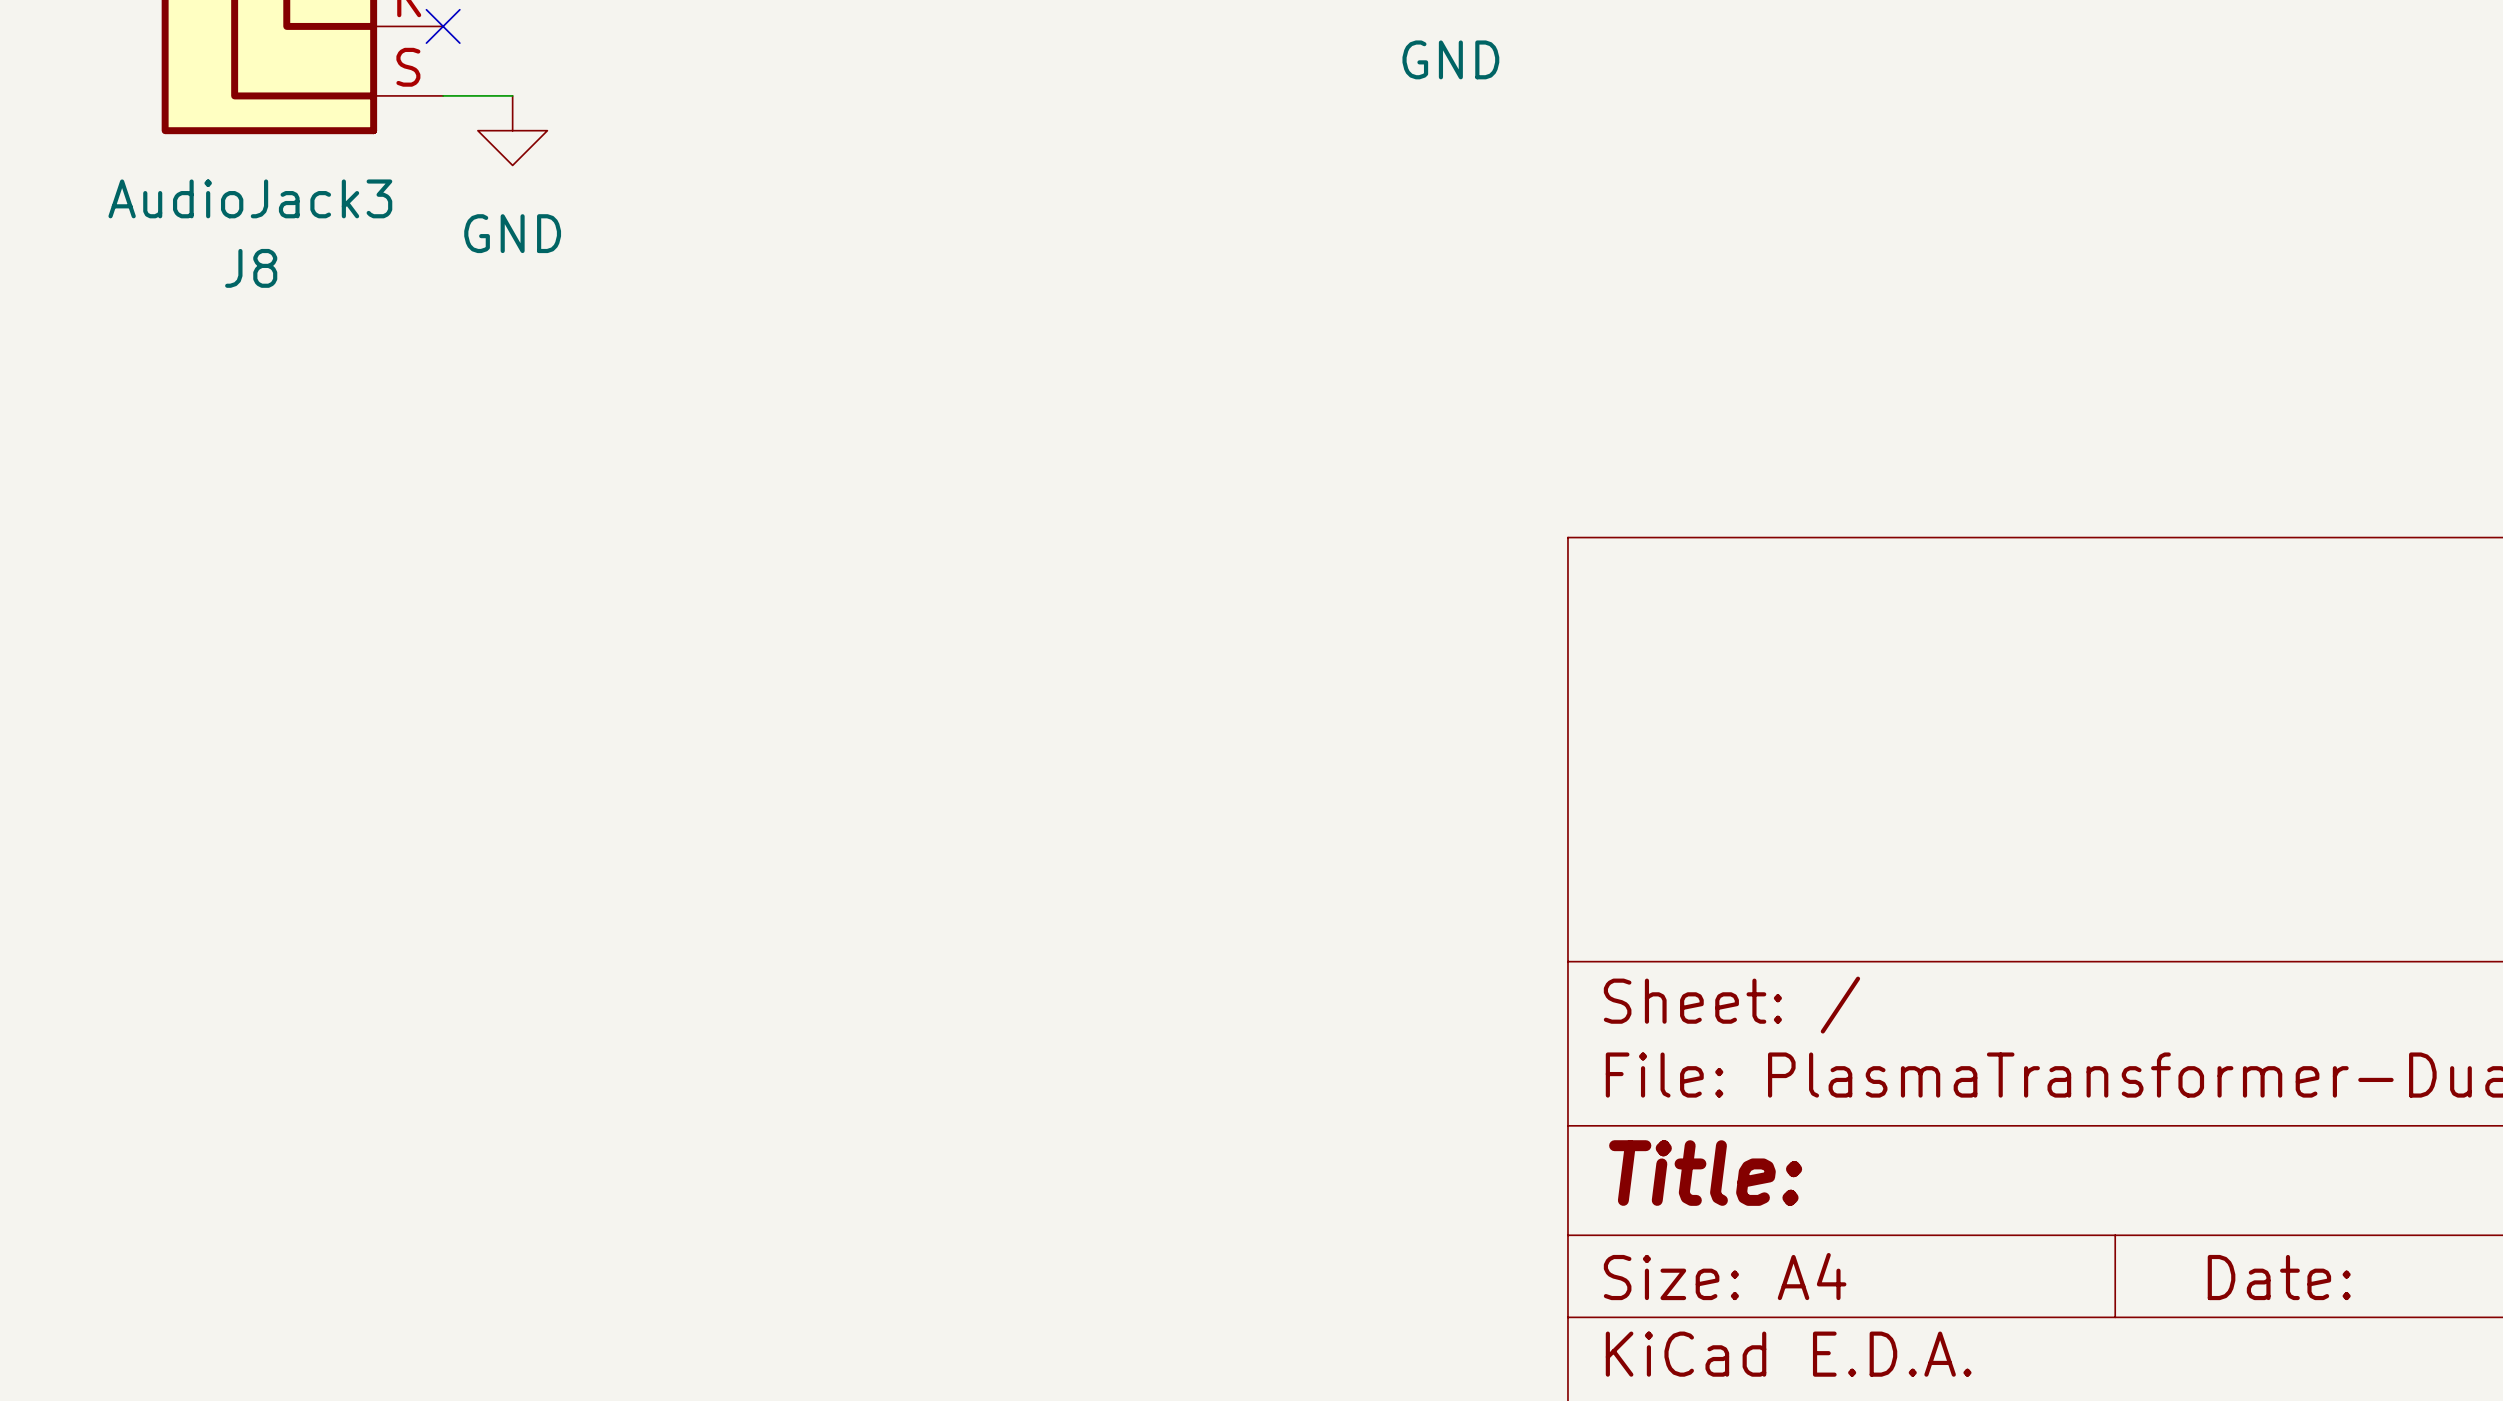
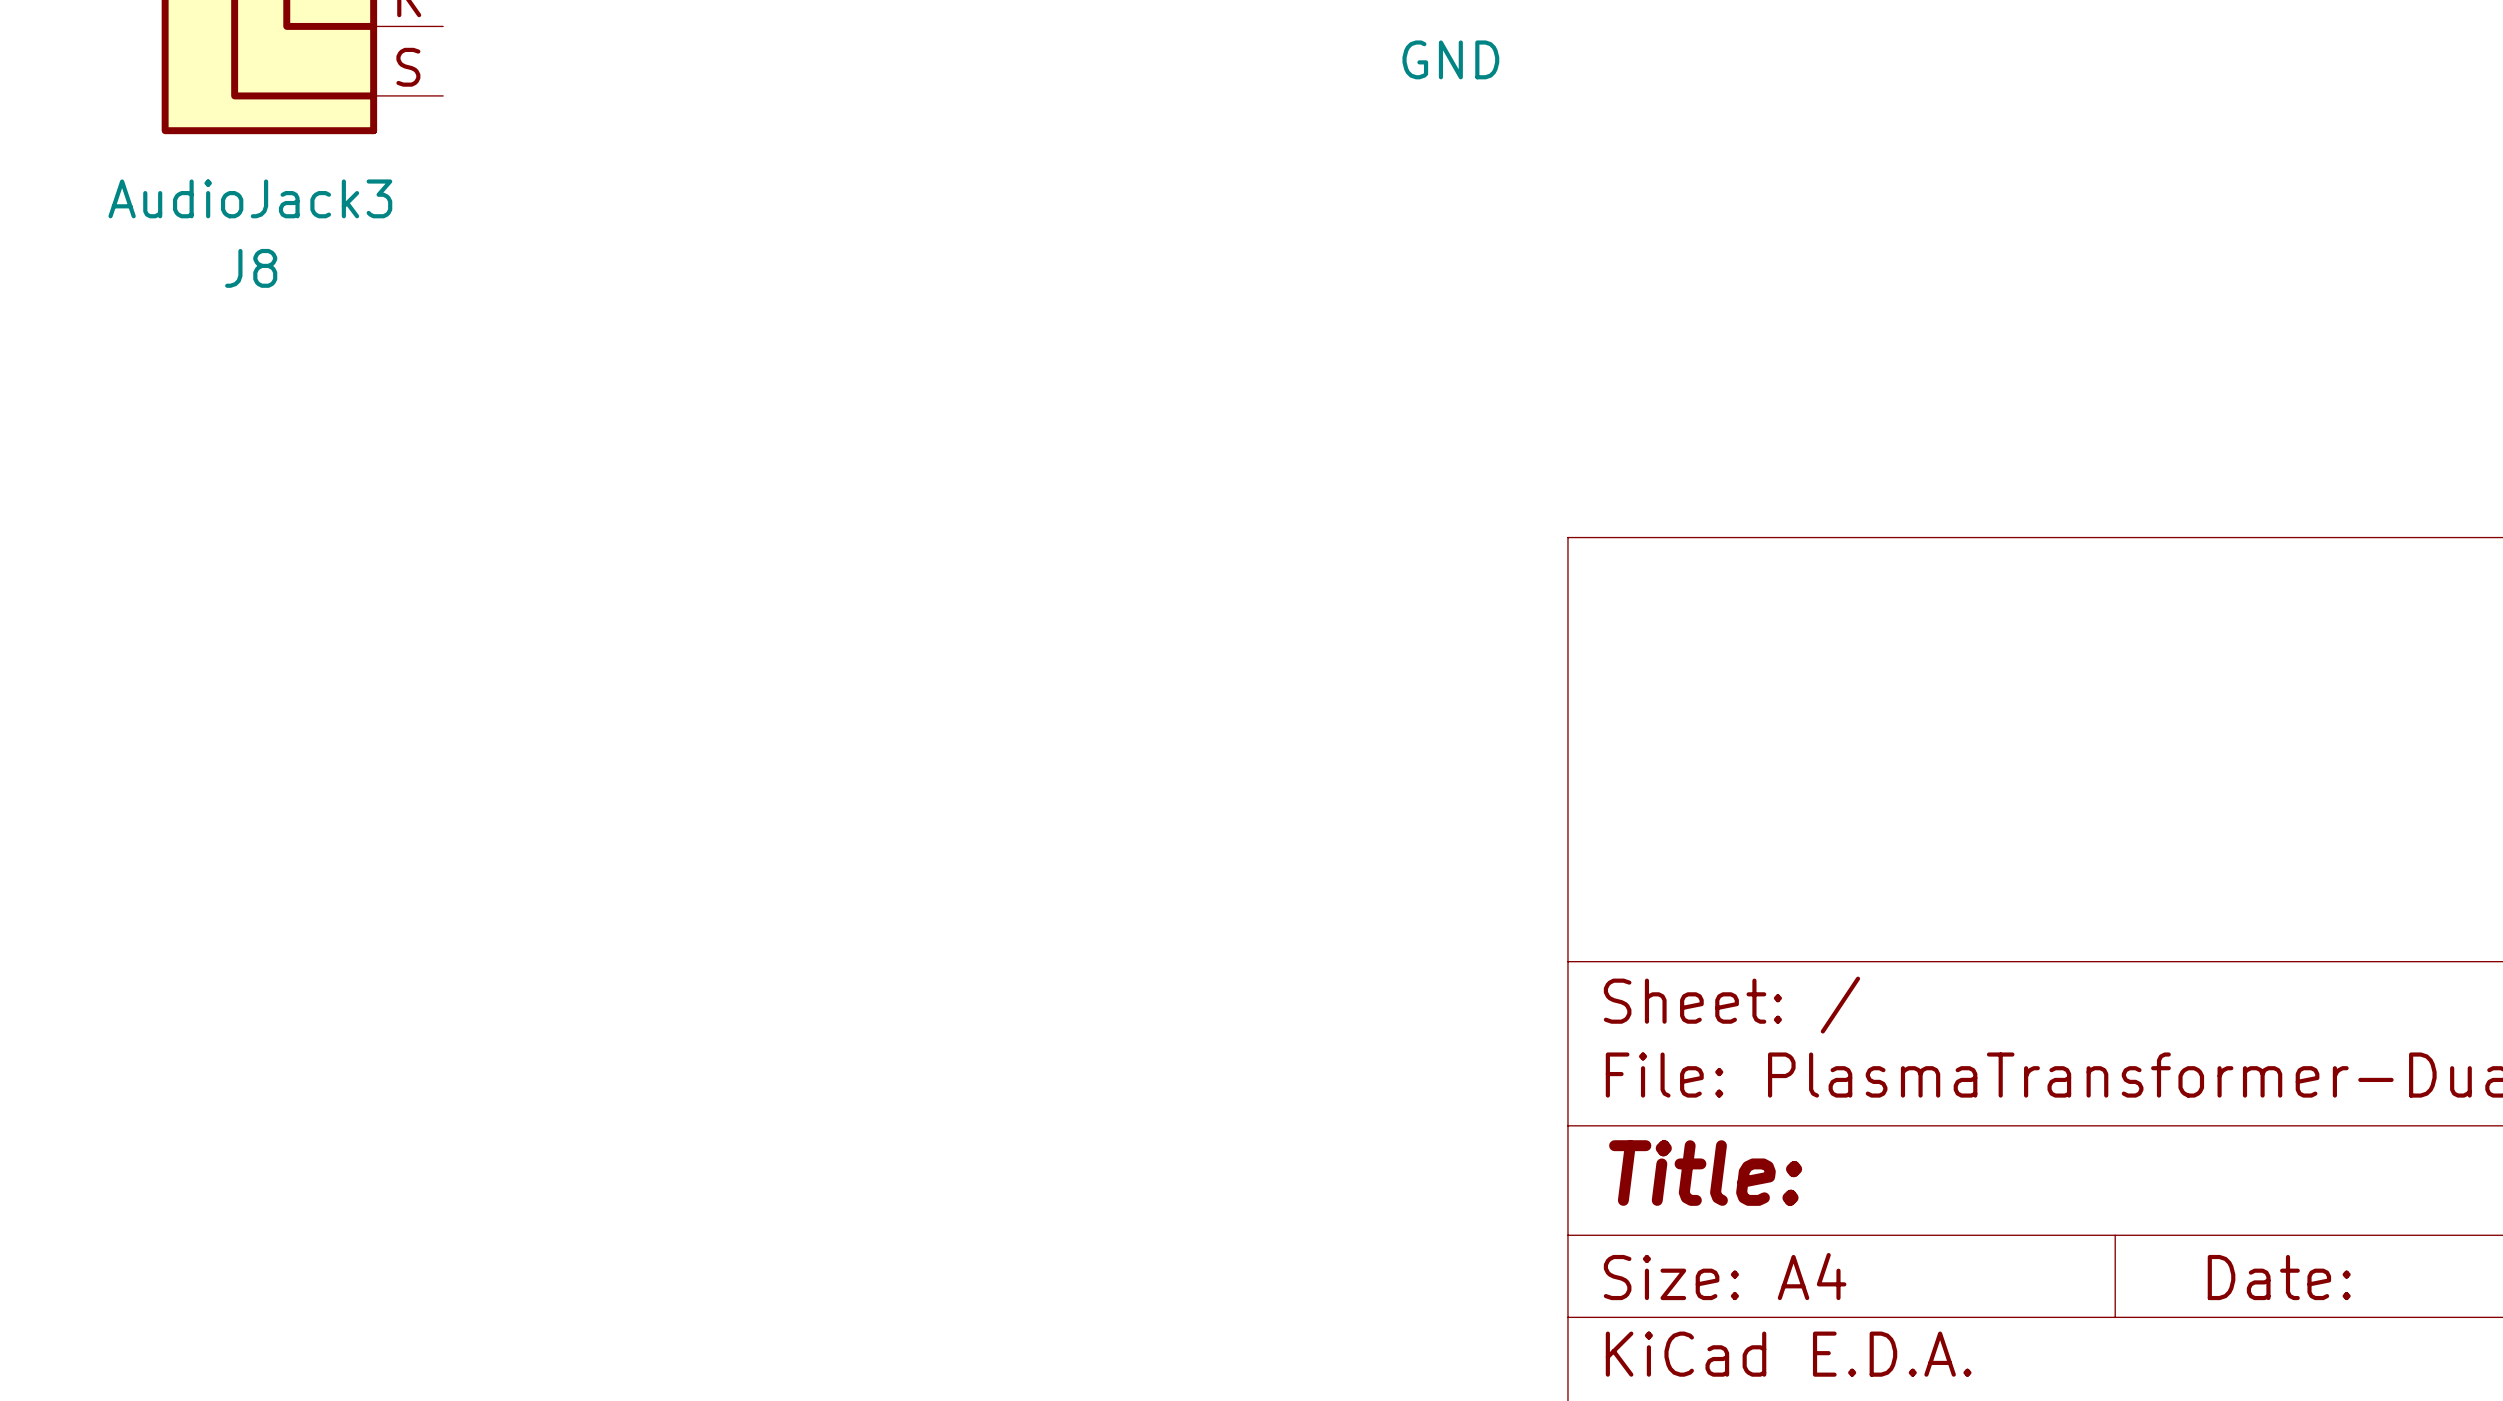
no-connect mark: (443, 26) -> none
wire: (443, 95) (512, 95) -> none
power symbol: GND (512, 130) -> none

